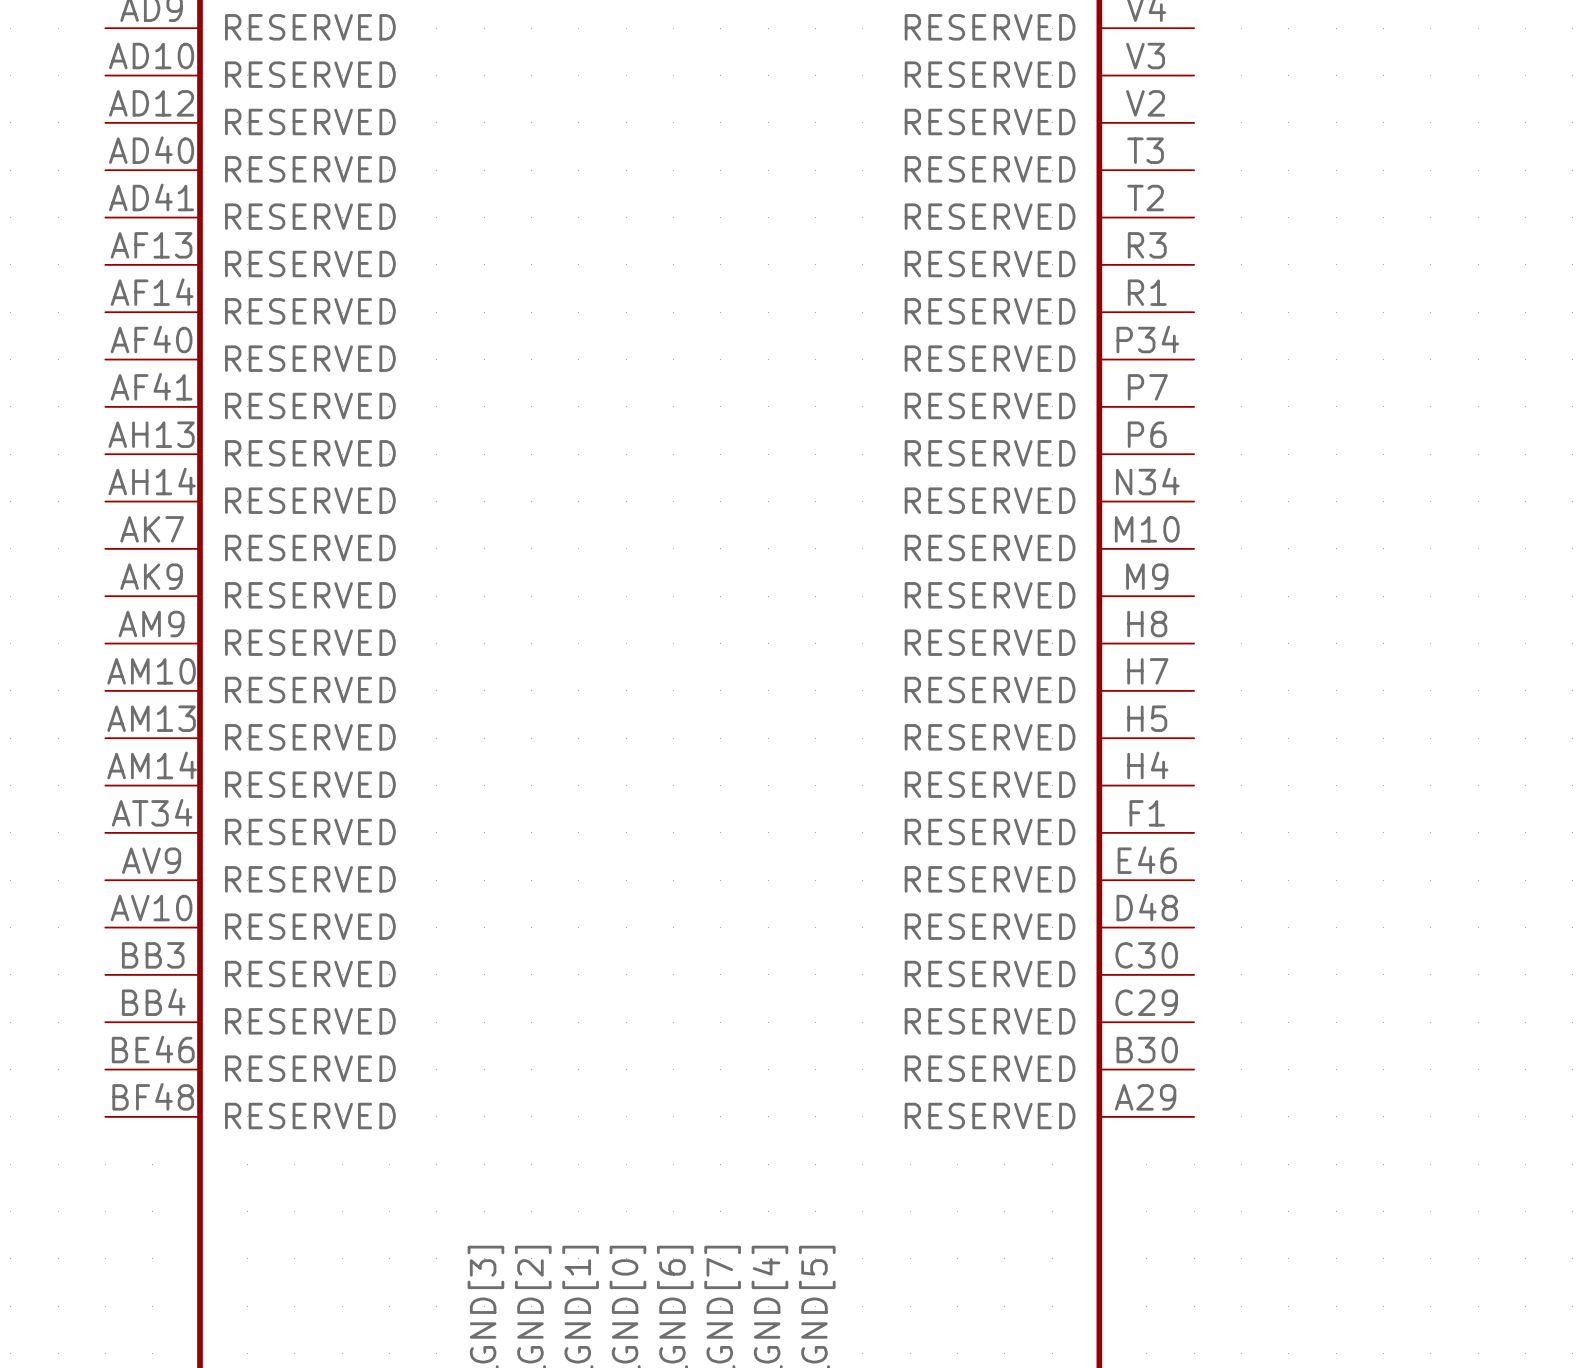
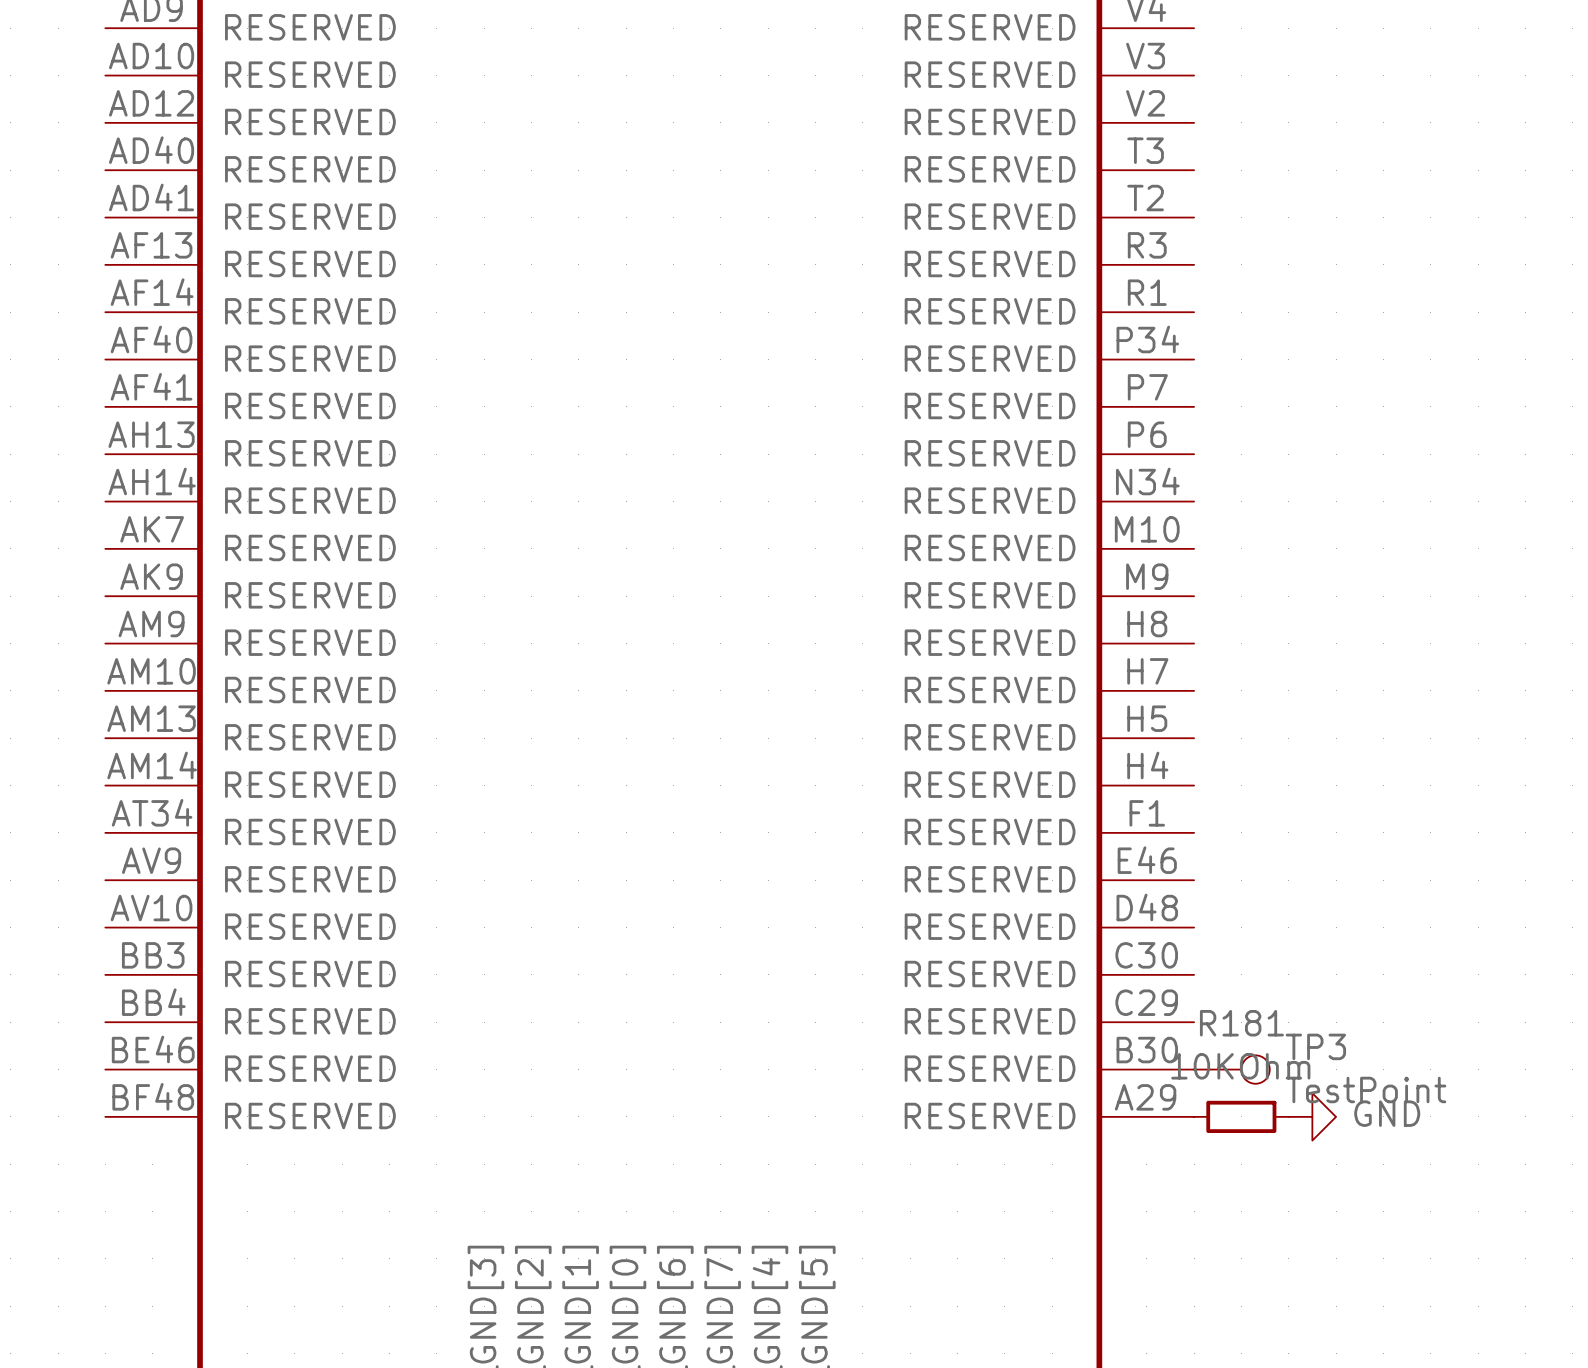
TP3: none -> TestPoint (1231, 1069)
R181: none -> 10KOhm (1241, 1116)
power symbol: none -> GND (1312, 1116)

